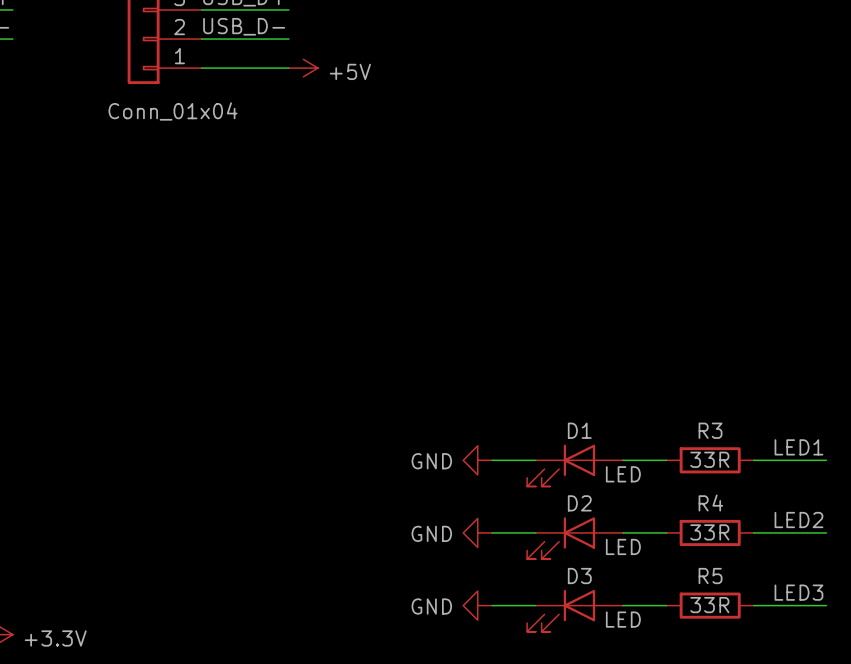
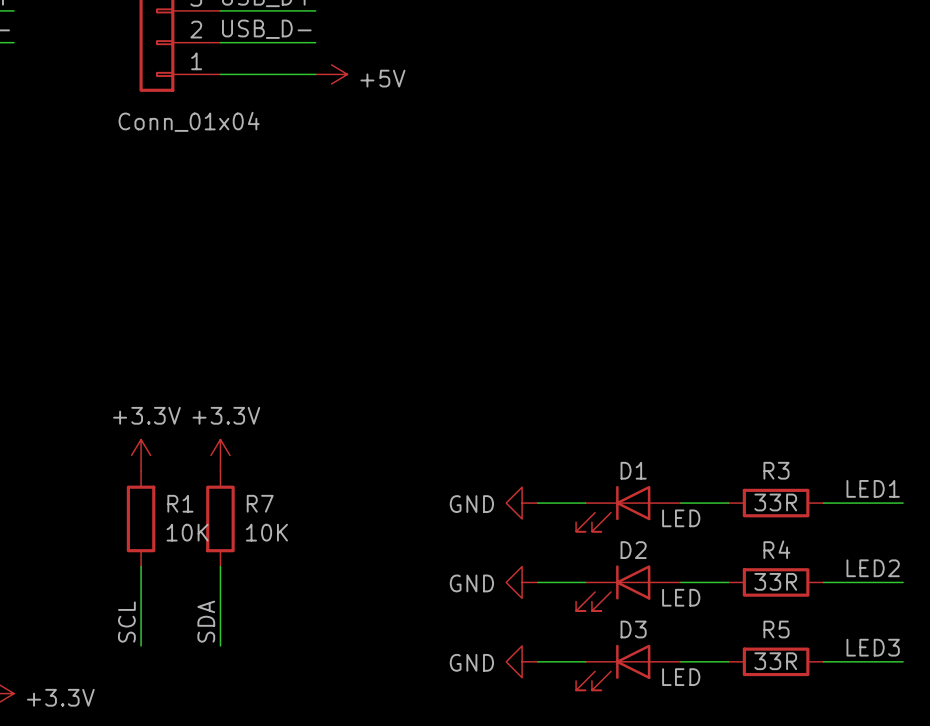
power symbol: none -> +3.3V (141, 455)
power symbol: none -> +3.3V (220, 455)
R1: none -> 10K (141, 518)
R7: none -> 10K (220, 518)
wire: none -> (141, 566) (141, 645)
wire: none -> (220, 566) (220, 645)
label: none -> SDA (206, 621)
label: none -> SCL (126, 622)

